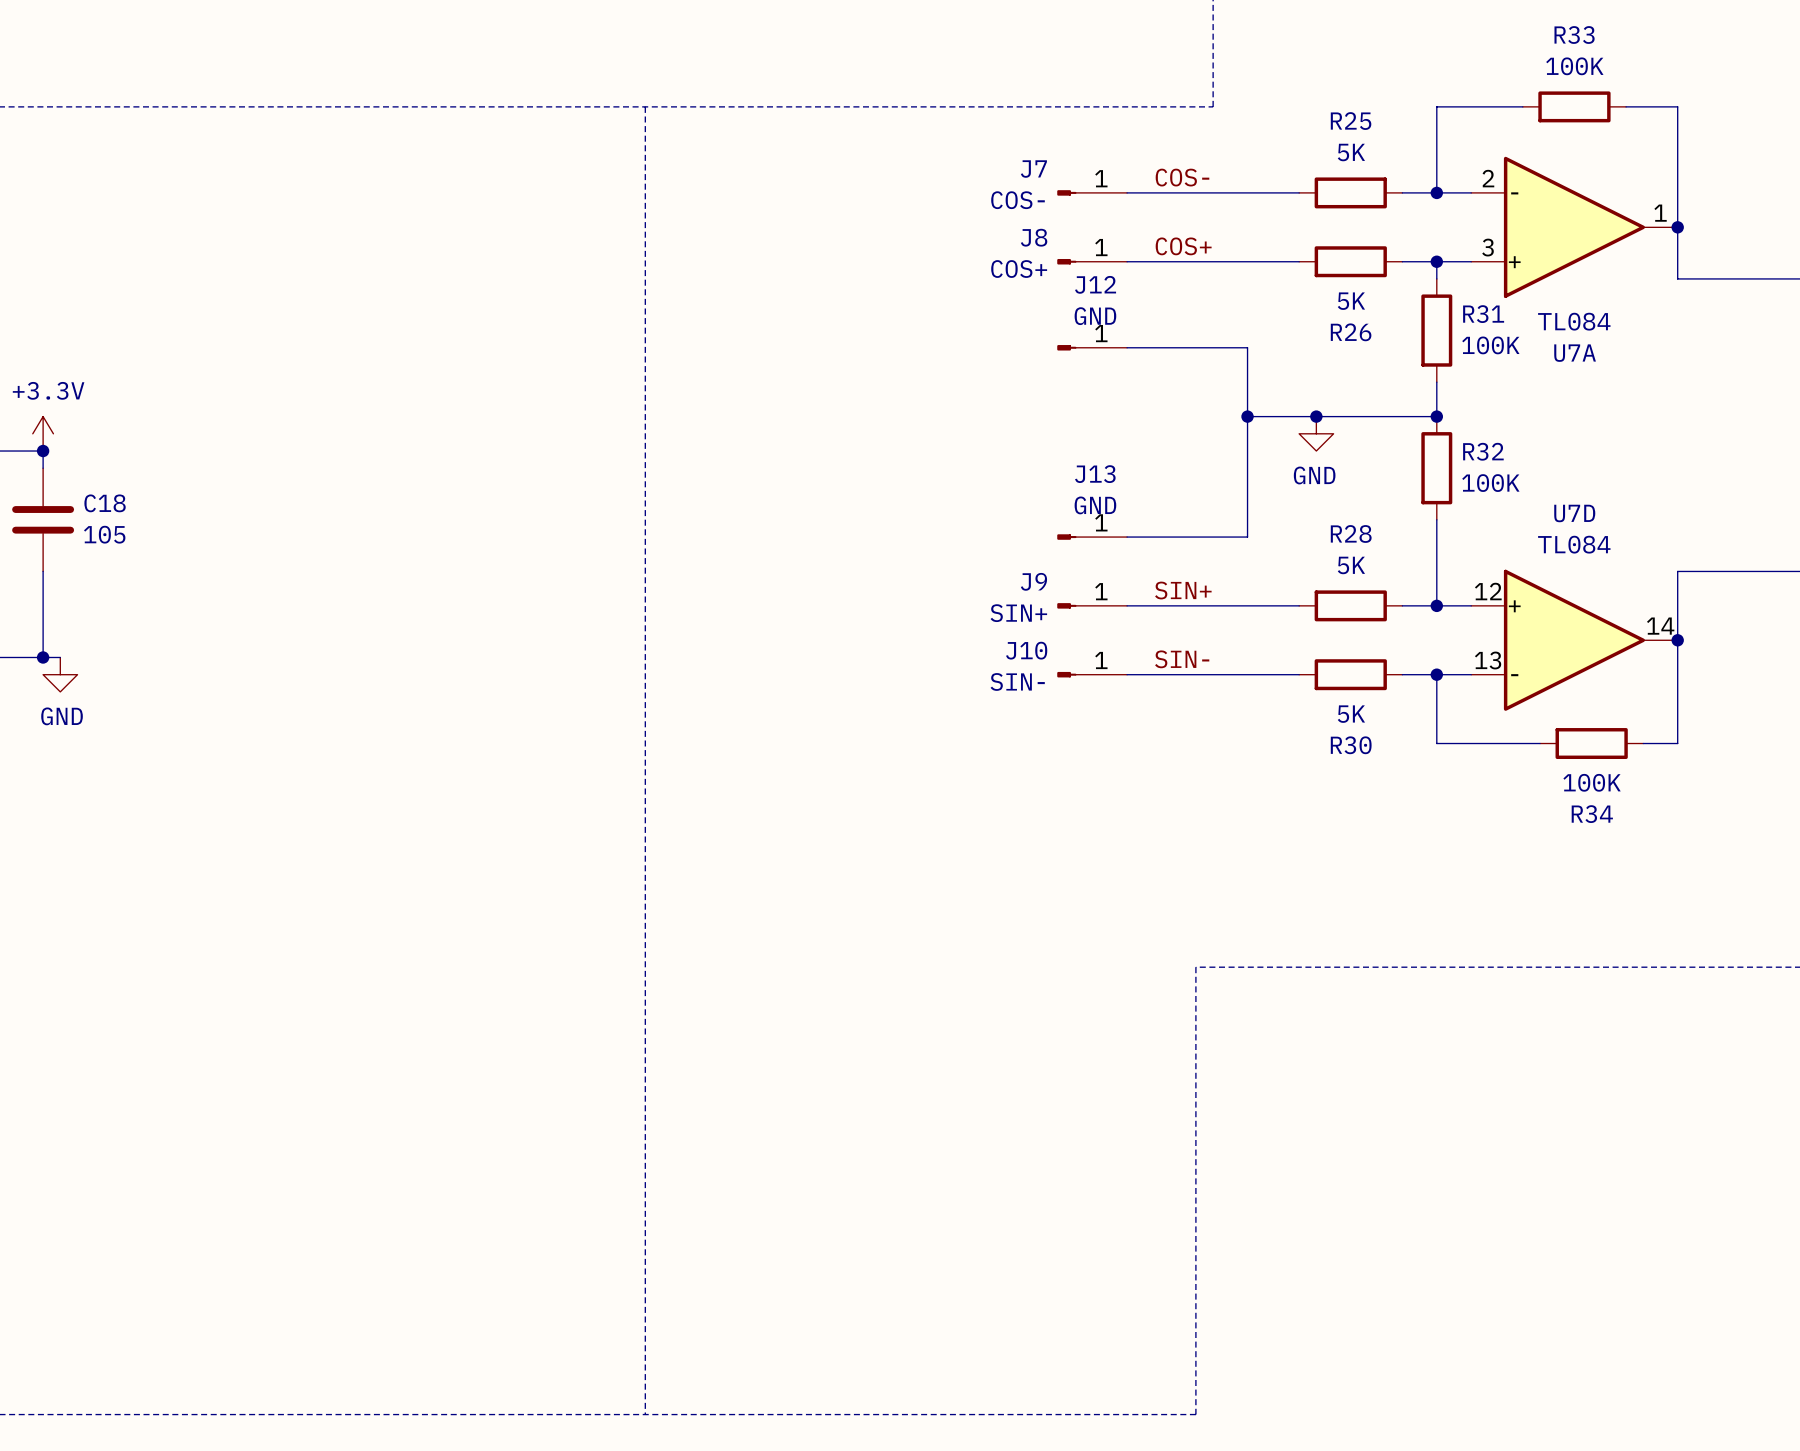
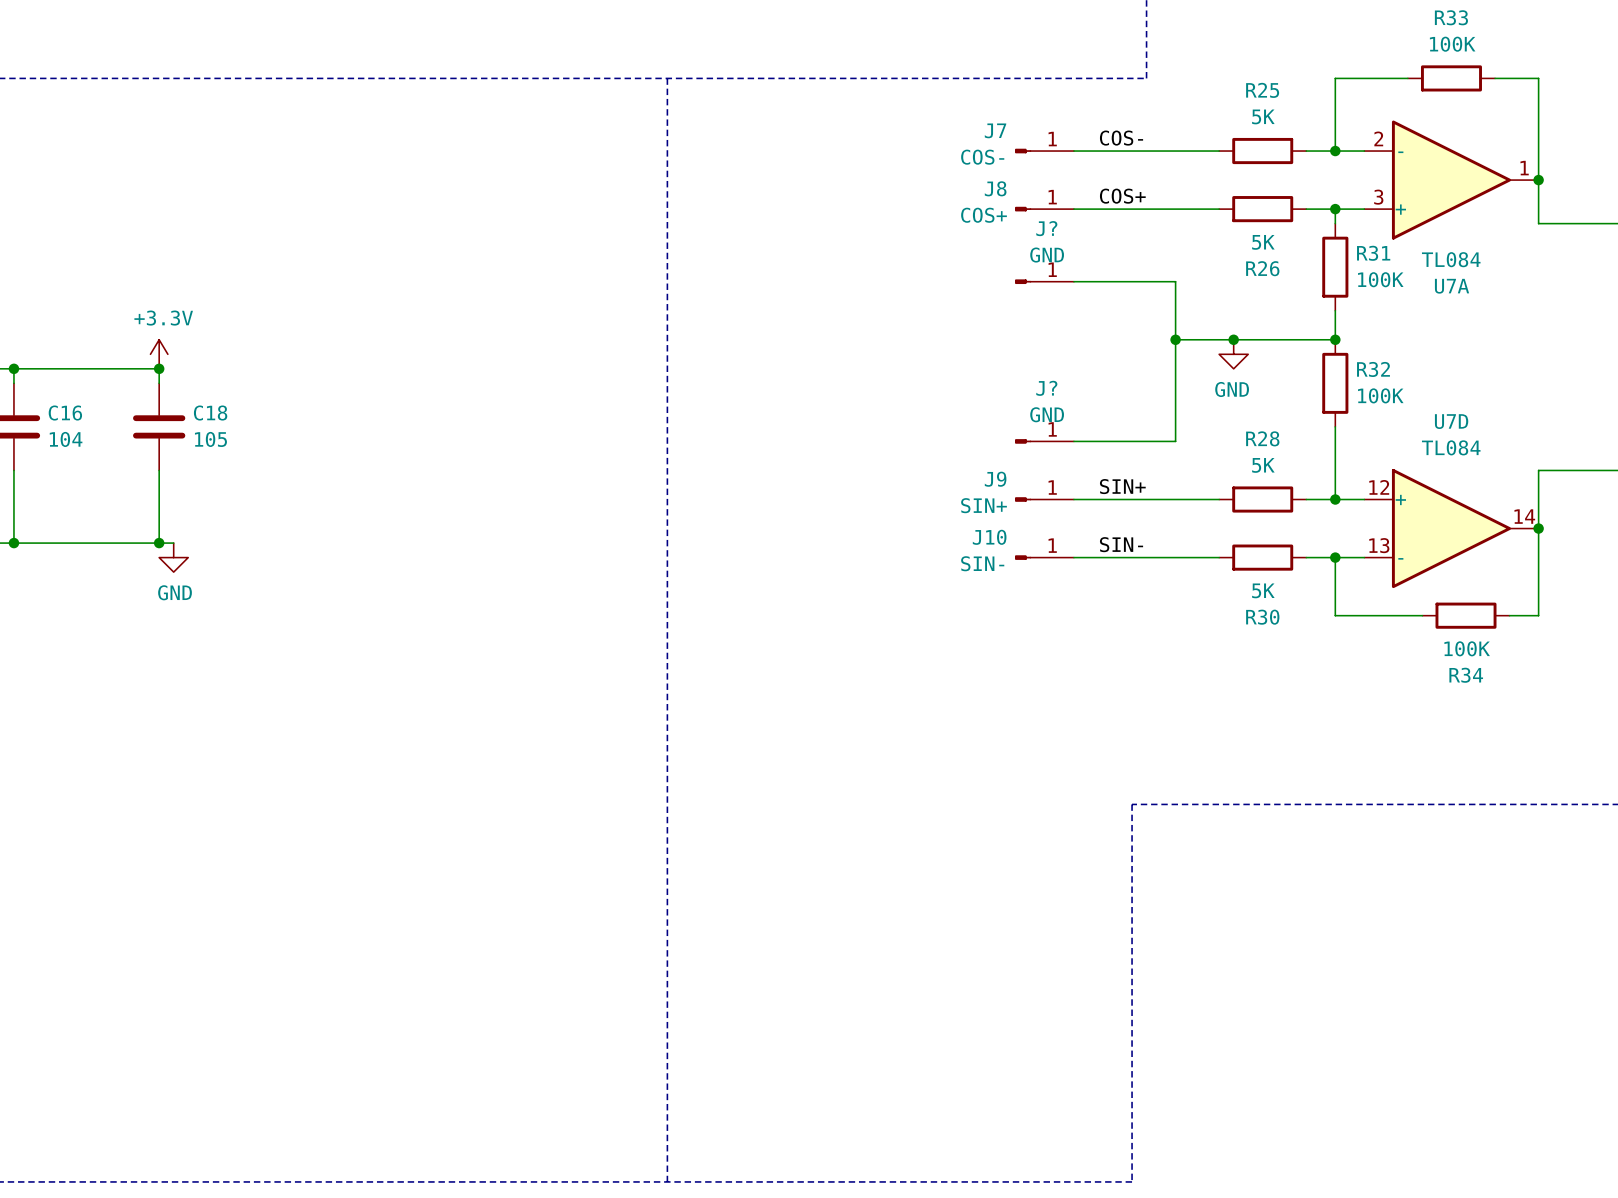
J12 name: J12 (1095, 284) -> J? (1046, 228)
J13 name: J13 (1095, 474) -> J? (1046, 388)

